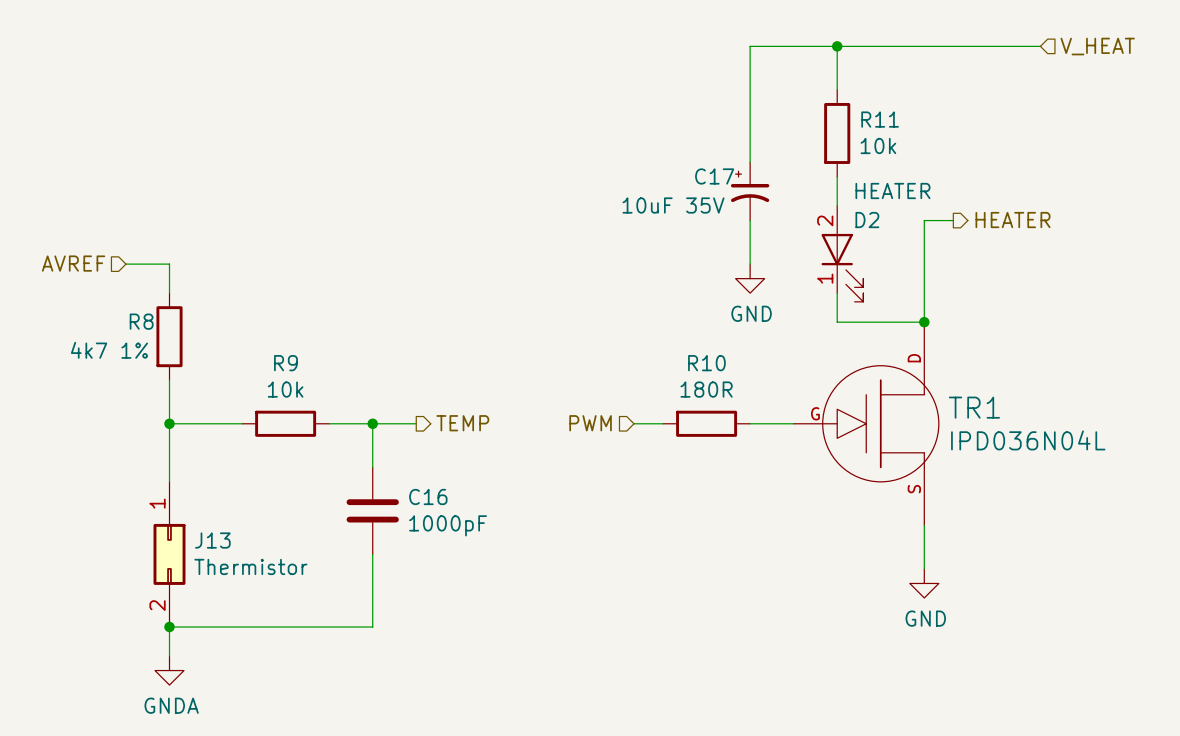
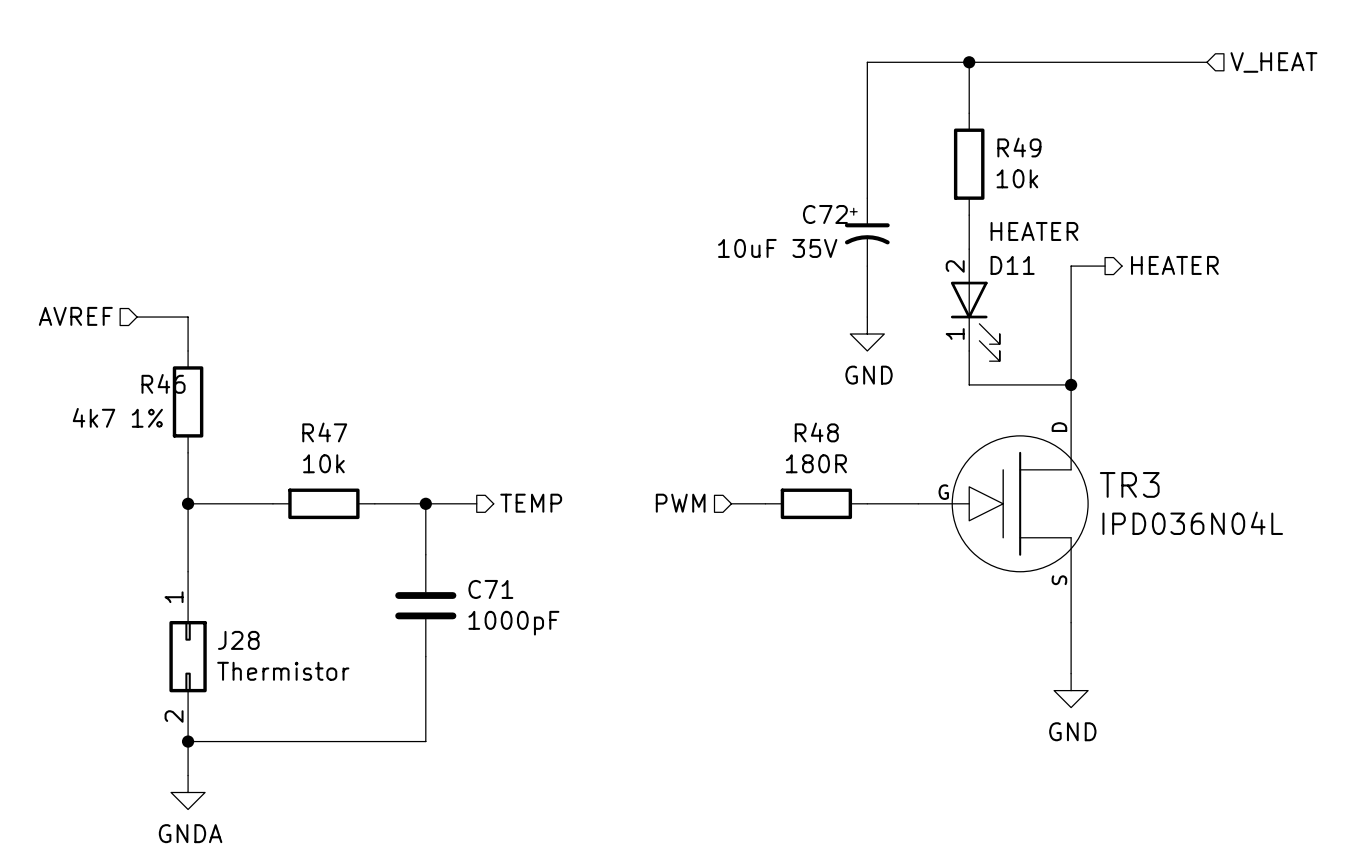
R11 name: R11 (880, 119) -> R49 (1019, 147)
C17 name: C17 (714, 176) -> C72 (825, 214)
D2 name: D2 (867, 220) -> D11 (1012, 265)
R8 name: R8 (141, 321) -> R46 (163, 383)
R9 name: R9 (285, 363) -> R47 (324, 432)
R10 name: R10 (706, 363) -> R48 (816, 432)
TR1 name: TR1 (974, 407) -> TR3 (1129, 484)
C16 name: C16 (428, 496) -> C71 (490, 589)
J13 name: J13 (212, 540) -> J28 (238, 640)

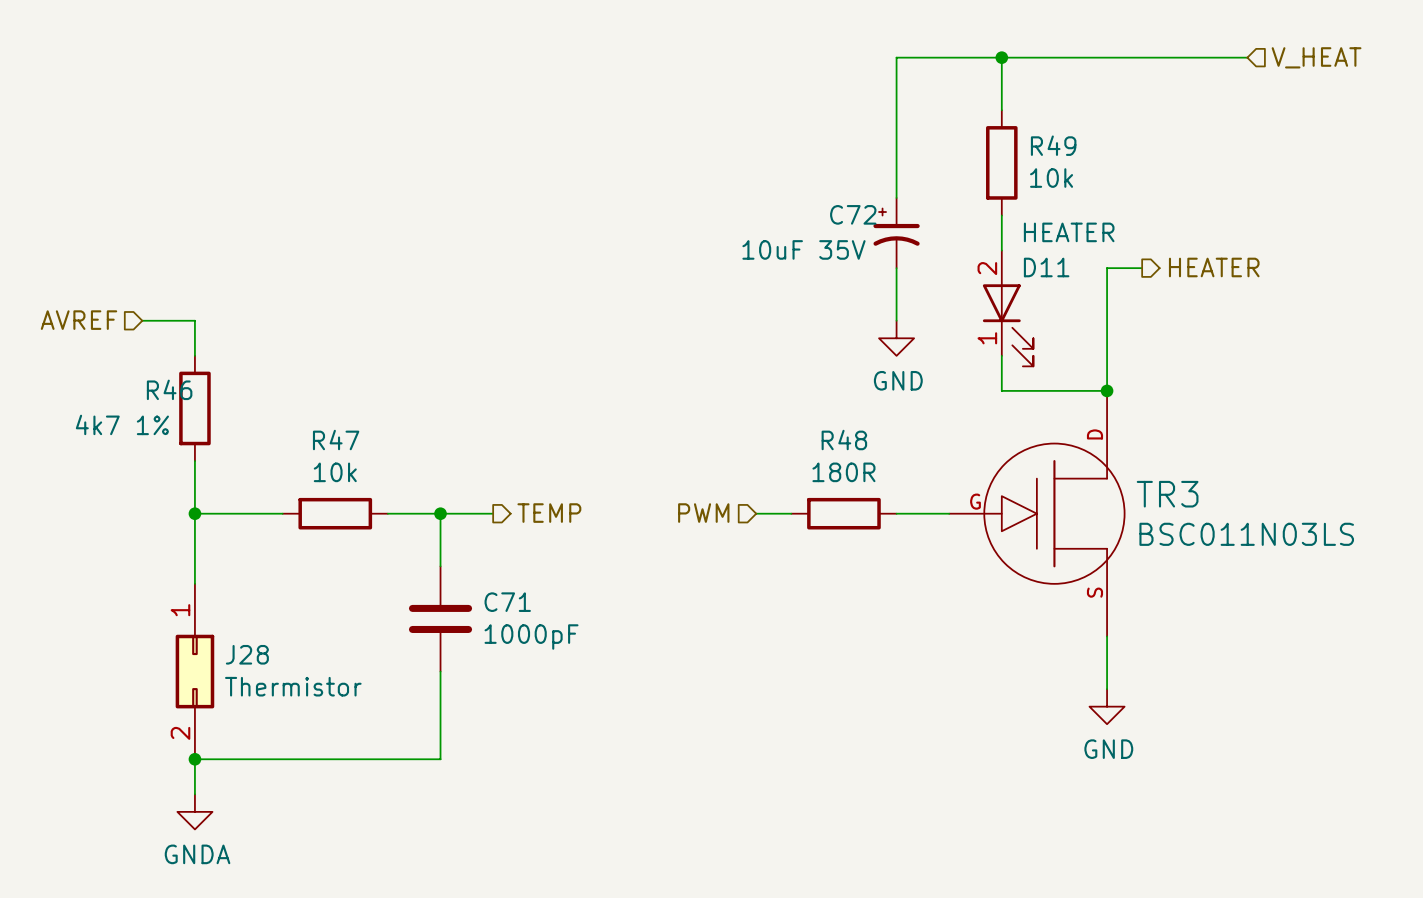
TR3 value: IPD036N04L (1192, 523) -> BSC011N03LS (1246, 534)

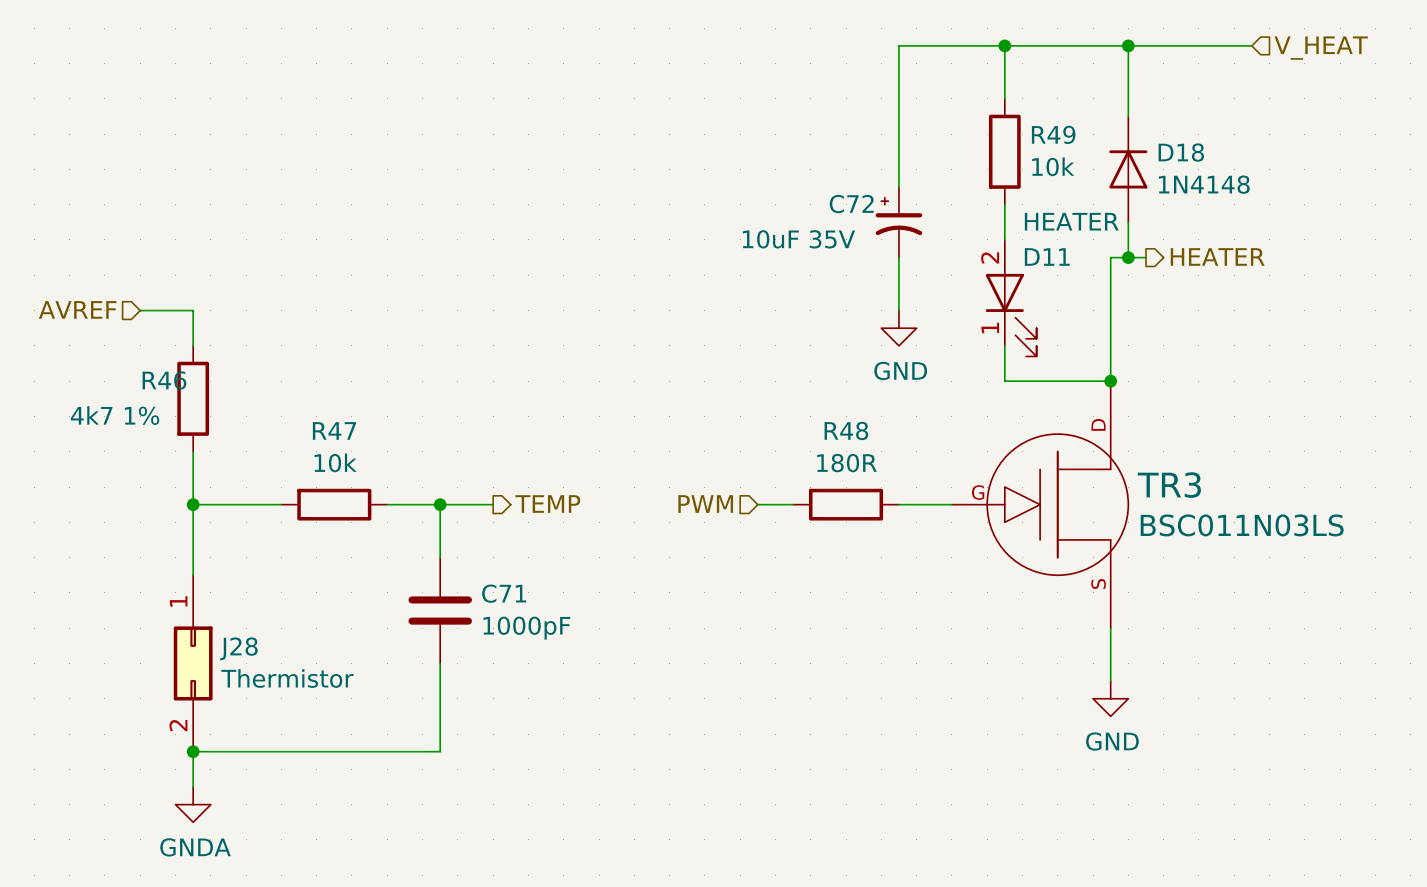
wire: none -> (1128, 45) (1128, 116)
junction: none -> (1128, 45)
D18: none -> 1N4148 (1128, 169)
wire: none -> (1128, 222) (1128, 257)
junction: none -> (1128, 257)

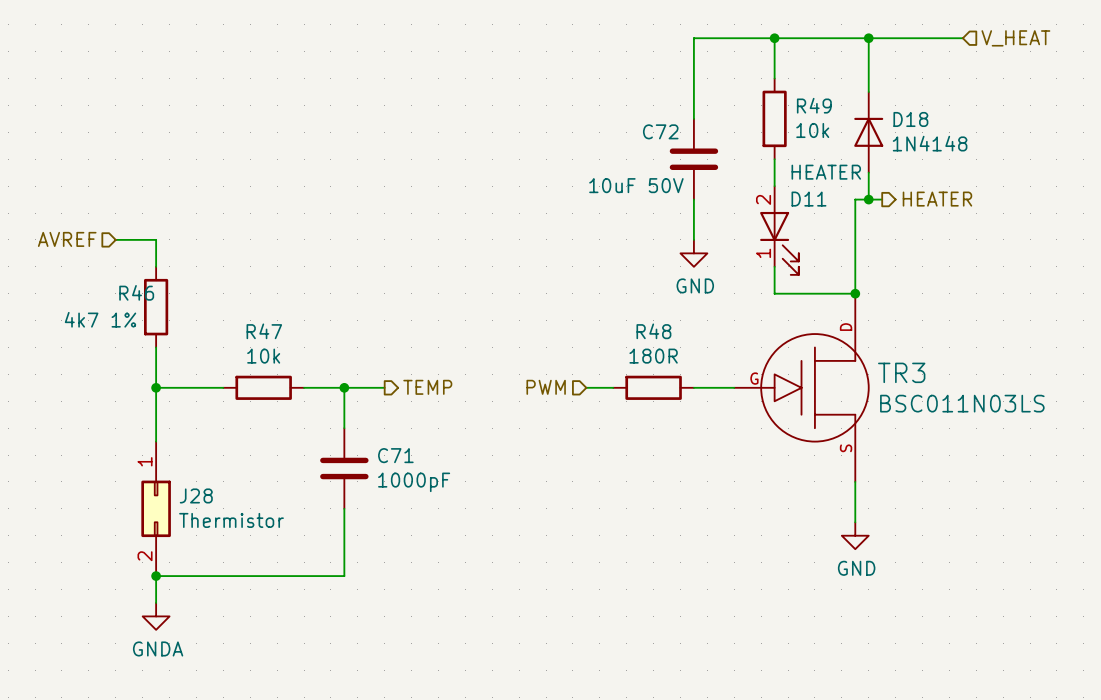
C72 symbol: [875, 187, 923, 258] -> [669, 118, 719, 200]
C72 value: 10uF 35V (798, 239) -> 10uF 50V (636, 185)

